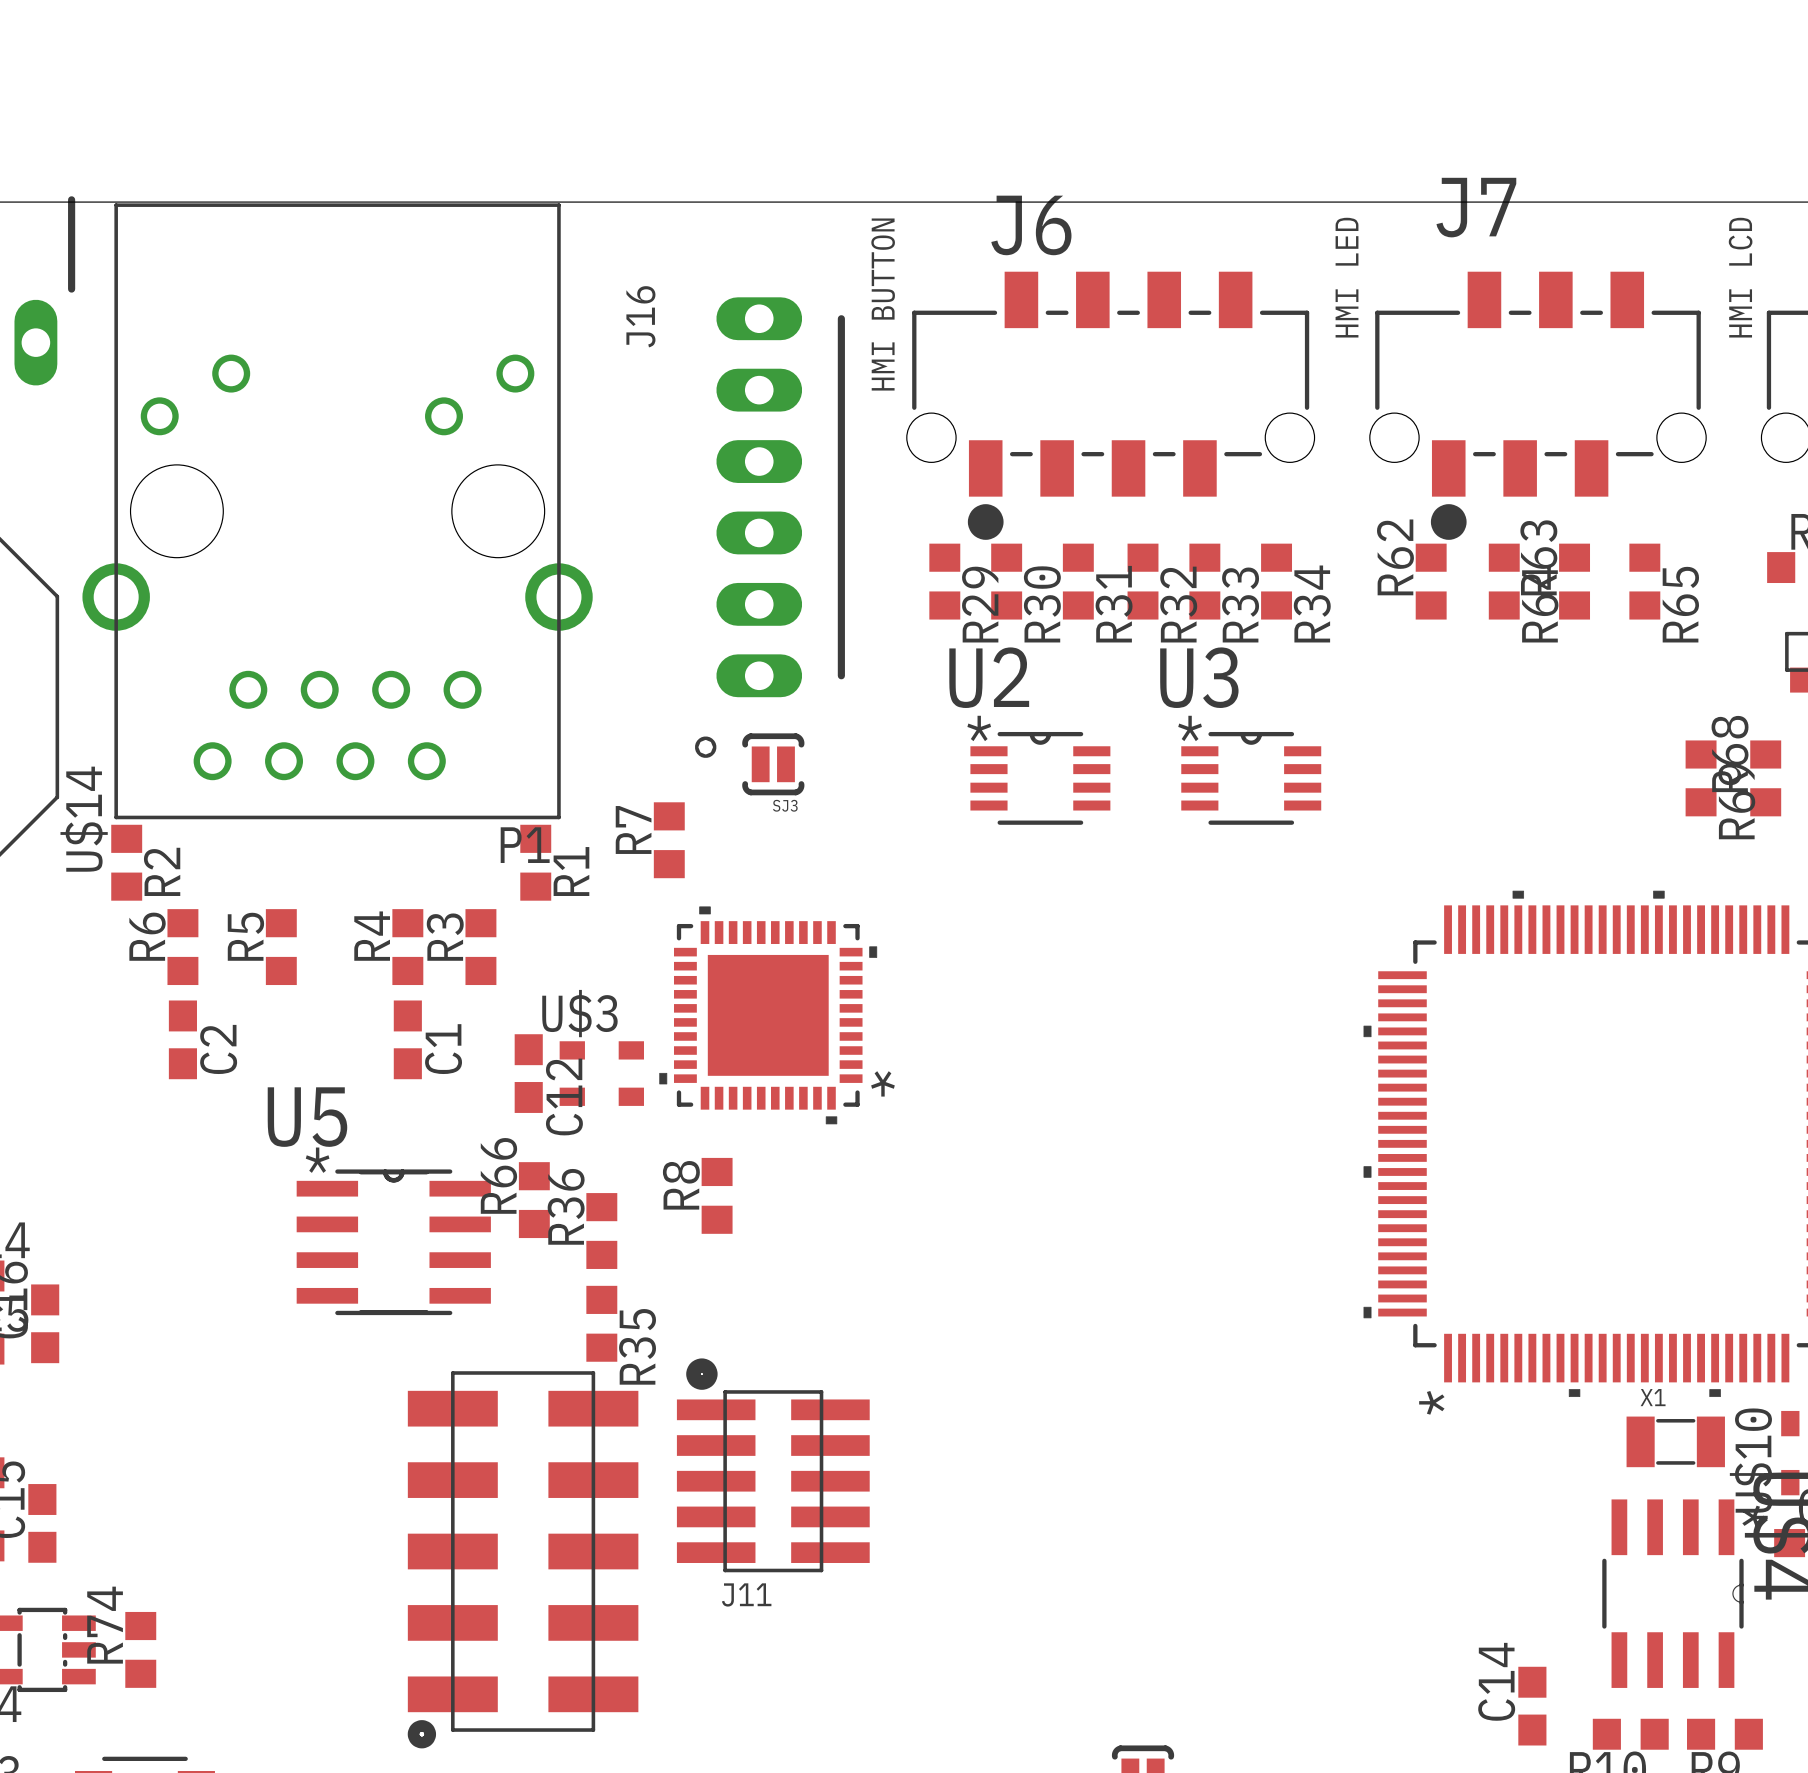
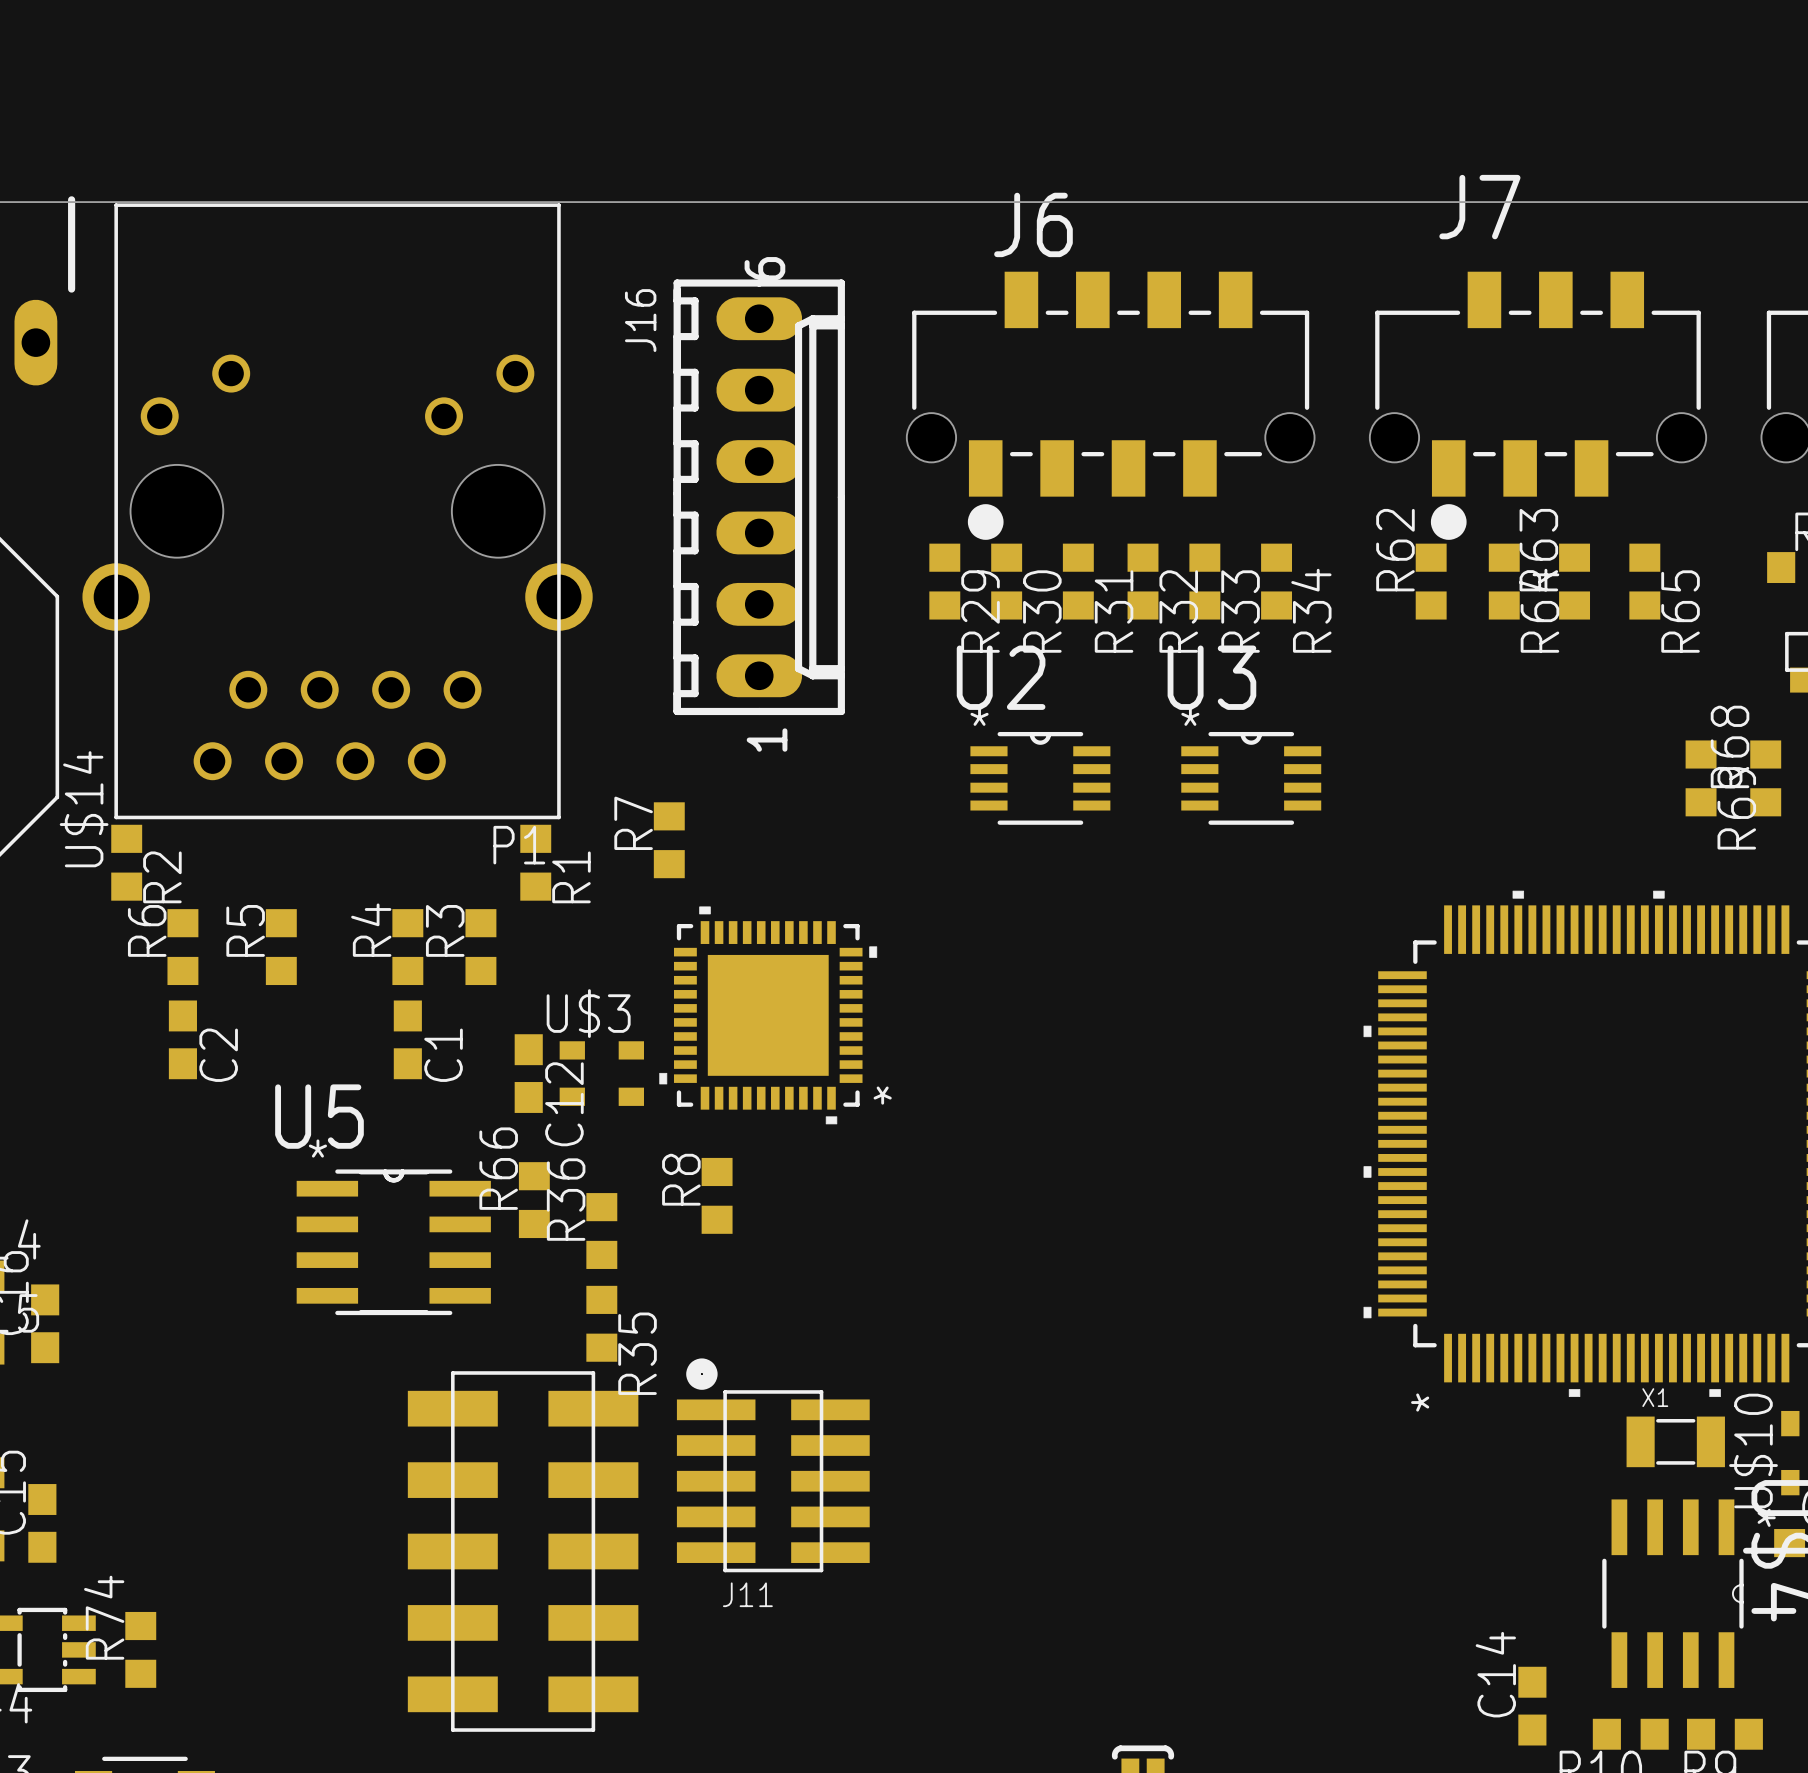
text: HMI LED (1347, 277) -> none
text: HMI LCD (1740, 277) -> none
J16 footprint: [694, 297, 845, 758] -> [673, 279, 845, 716]
text: HMI BUTTON (883, 304) -> none
SJ3: (773, 764) -> none
drawing: [407, 1720, 437, 1749] -> none

